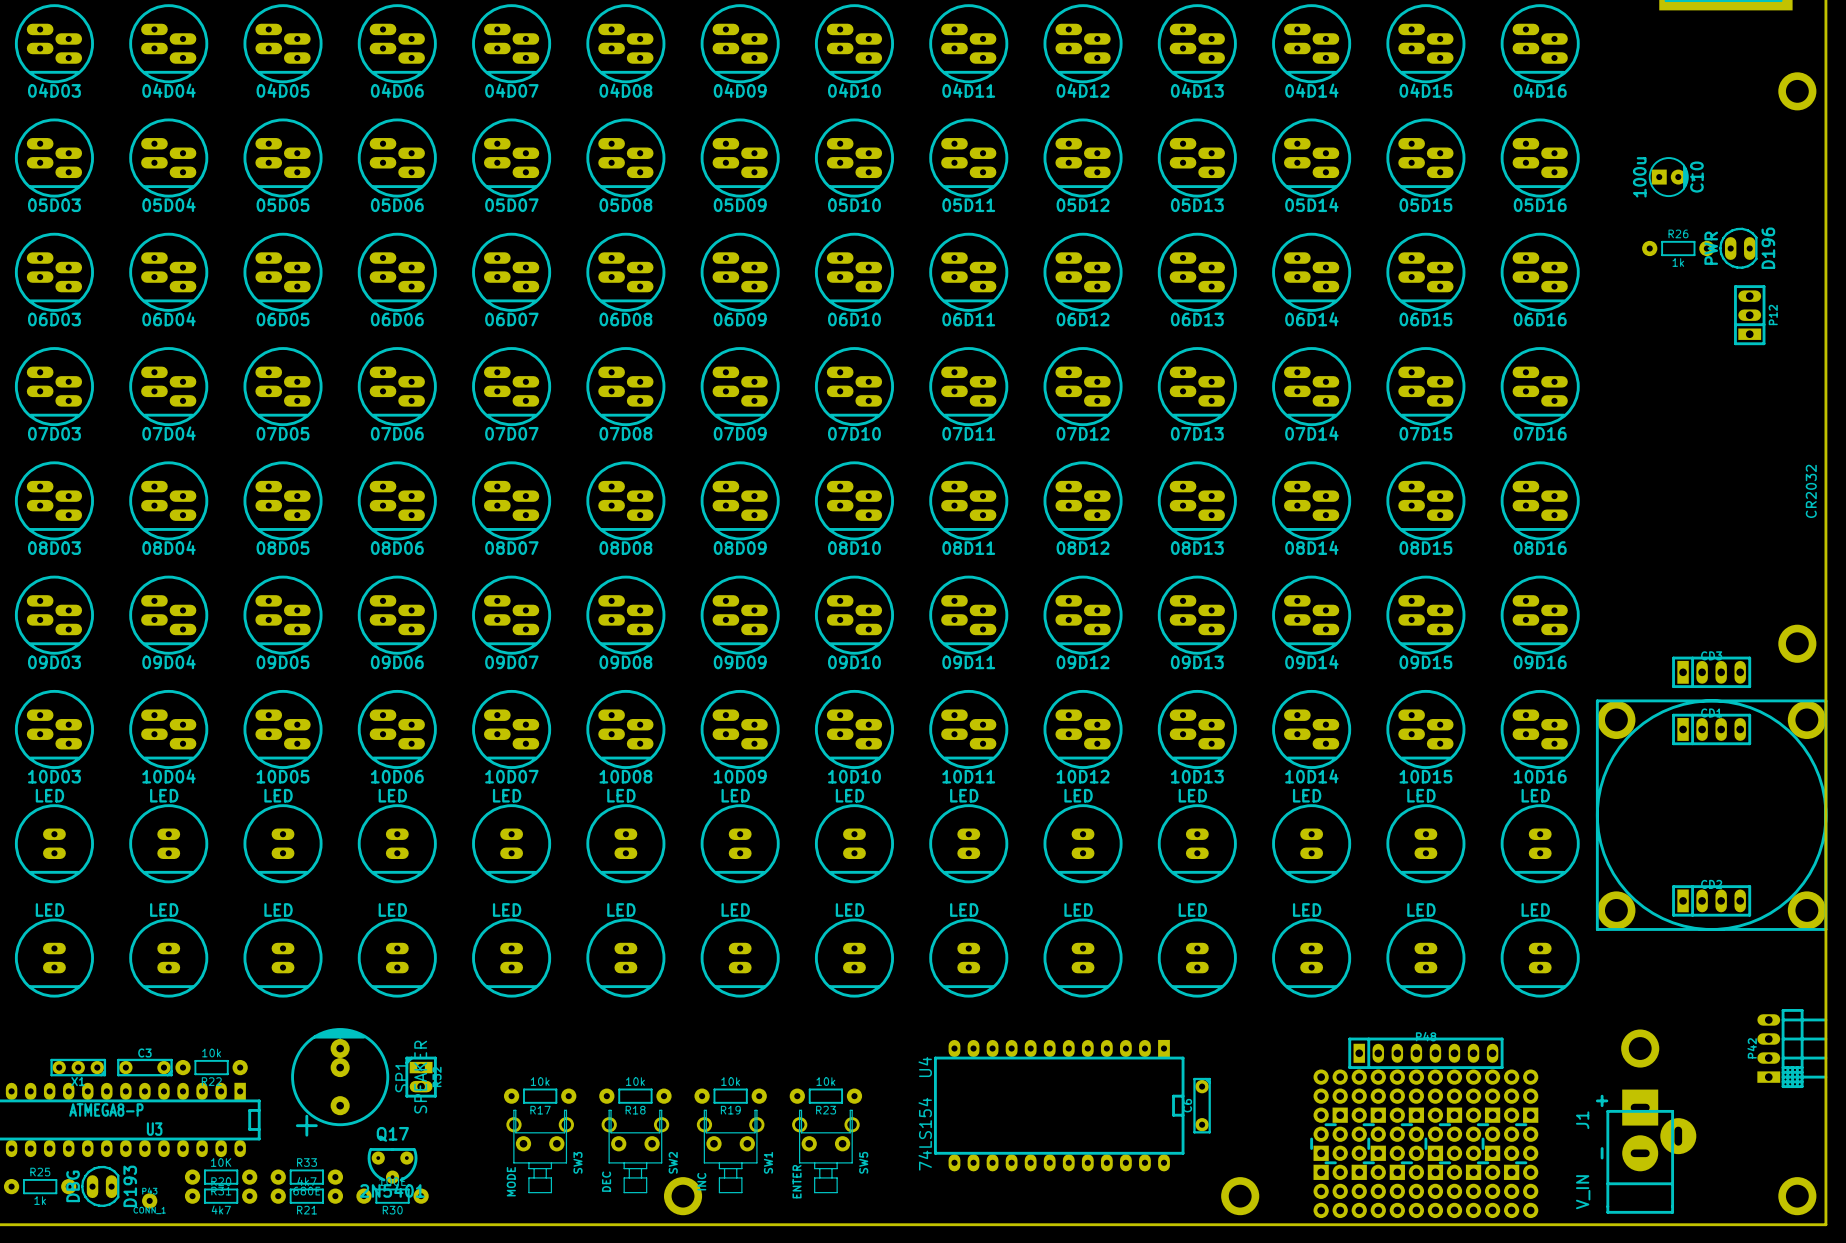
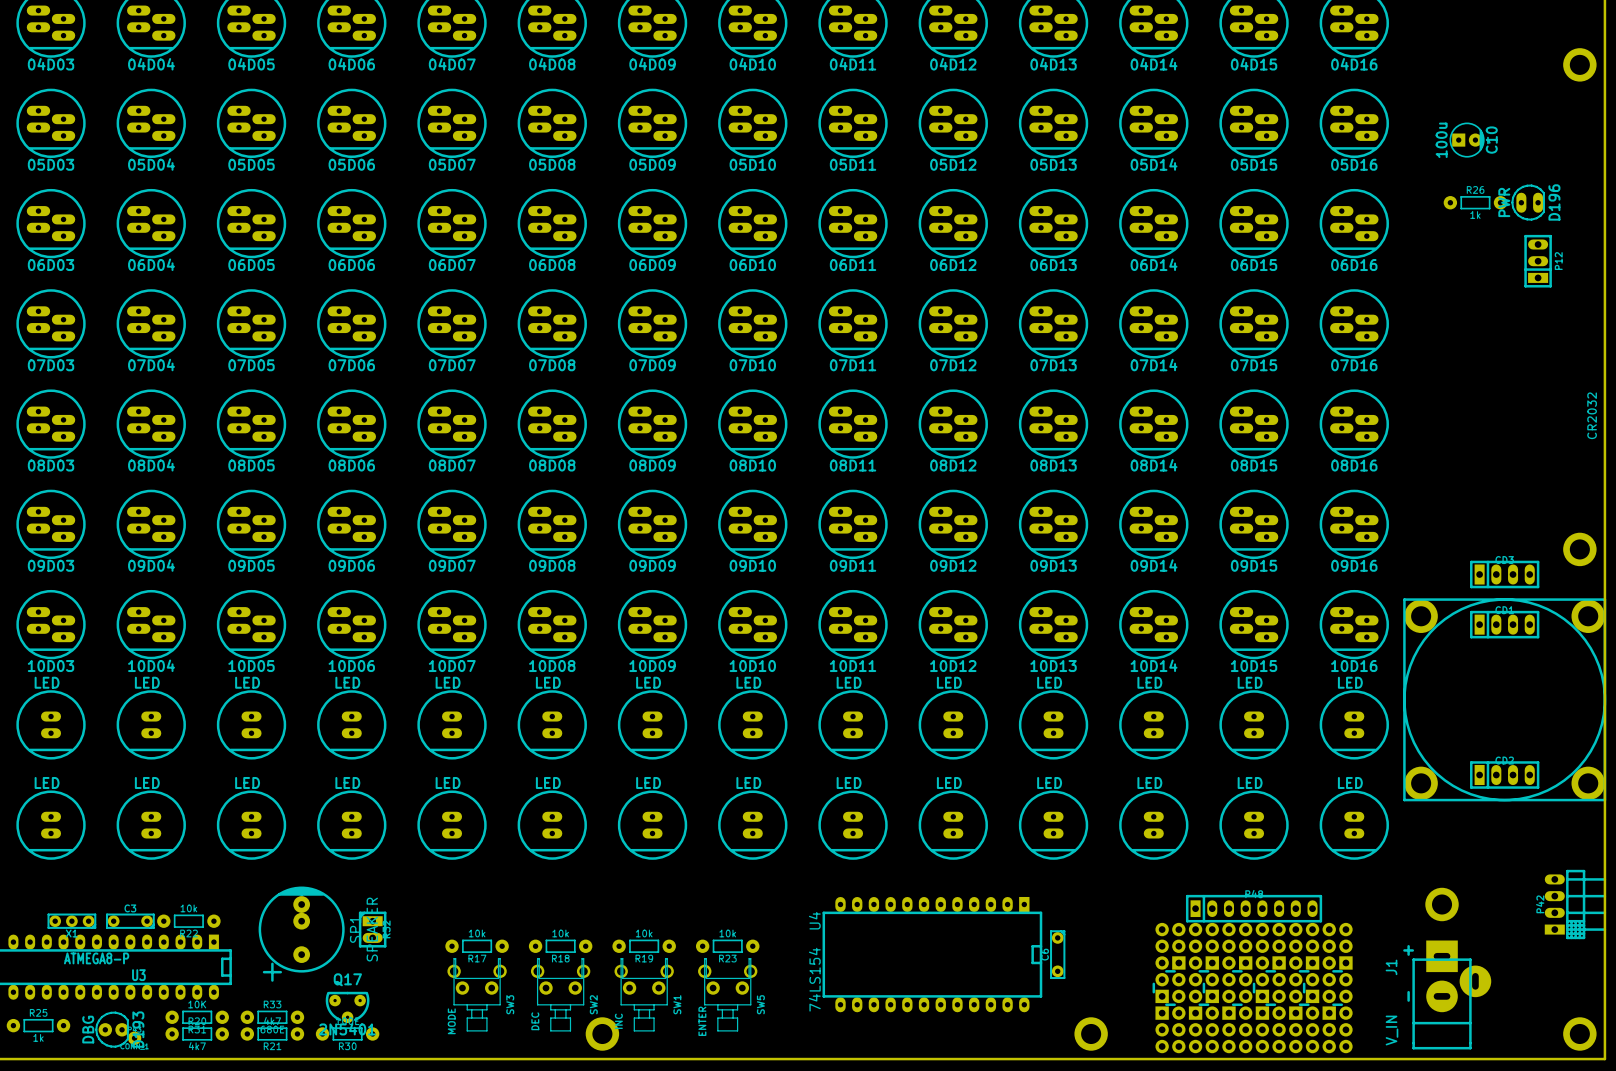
D193 footprint: [81, 1165, 120, 1208] -> [95, 1011, 129, 1048]

